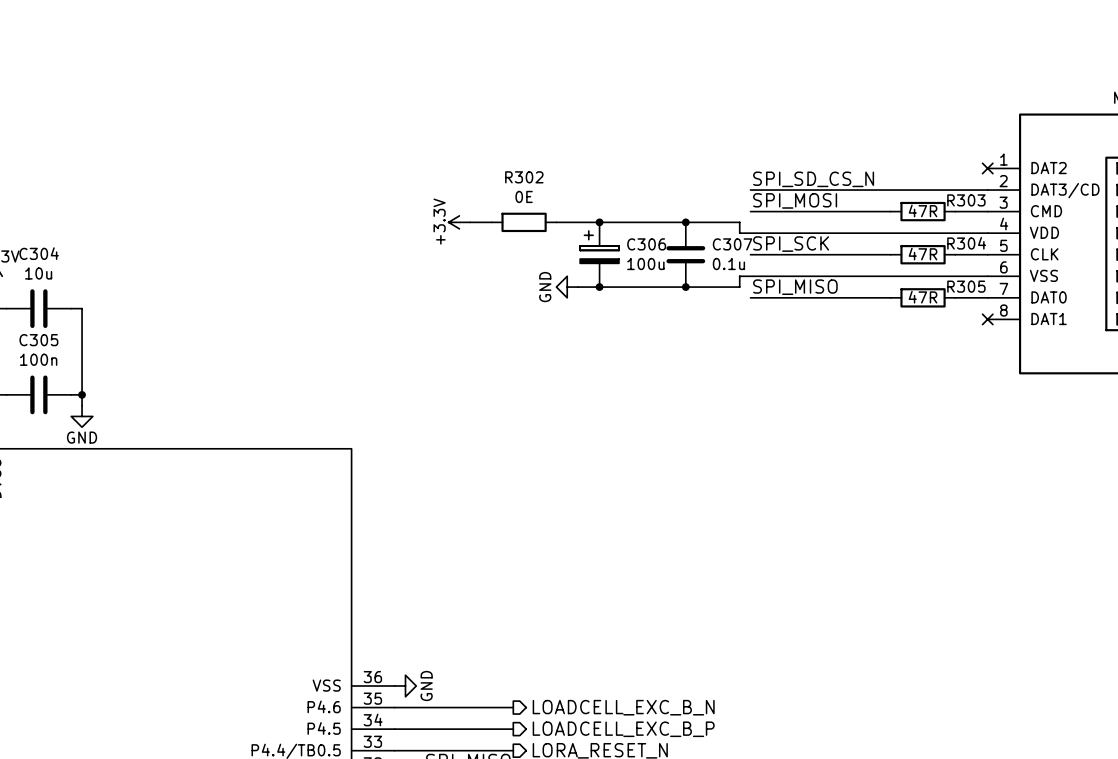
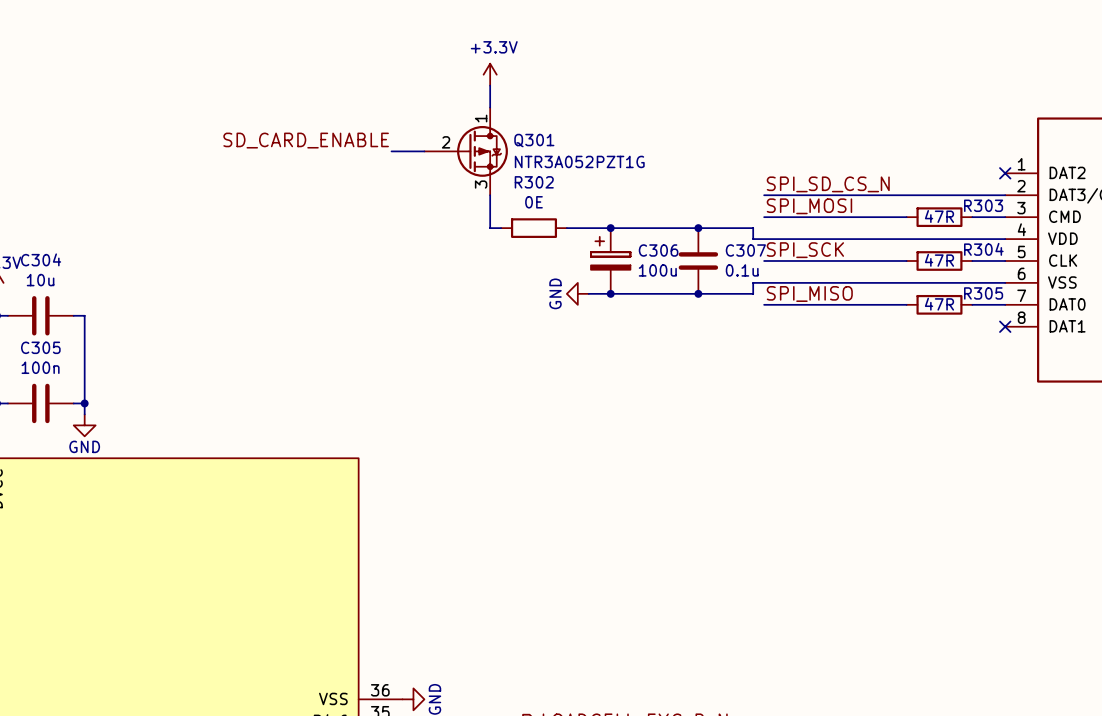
wire: none -> (490, 85) (490, 107)
label: none -> SD_CARD_ENABLE (306, 140)
wire: none -> (391, 151) (424, 151)
Q301: none -> NTR3A052PZT1G (466, 151)
power symbol rotation: 0° (459, 222) -> 90° clockwise (490, 74)
power symbol position: +3.3V (459, 222) -> +3.3V (490, 74)
wire: (470, 222) (480, 222) -> (490, 195) (490, 228)

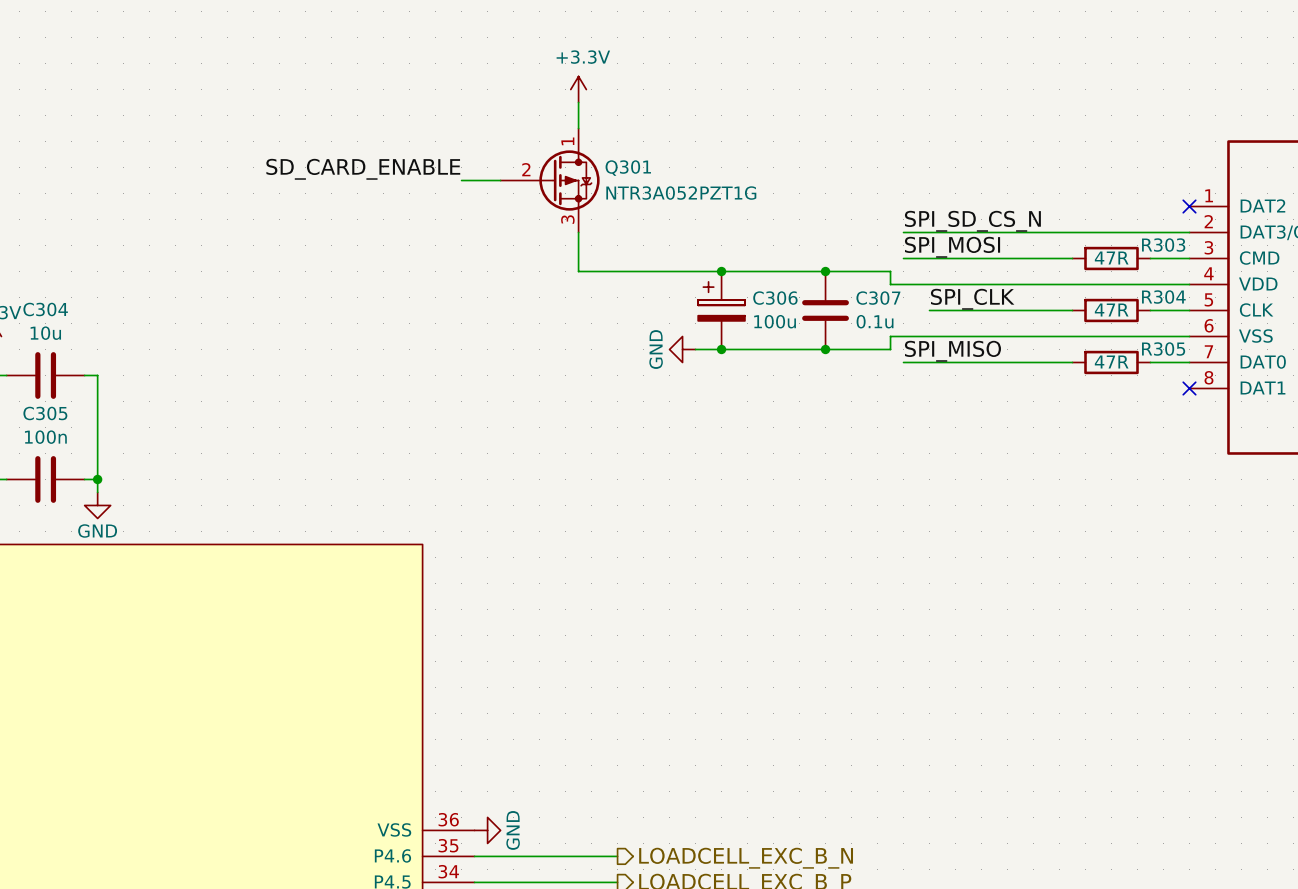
wire: none -> (591, 271) (669, 271)
R302: 0E (534, 228) -> none
label: SPI_SCK (805, 250) -> SPI_CLK (972, 299)
wire: (764, 260) (786, 260) -> none

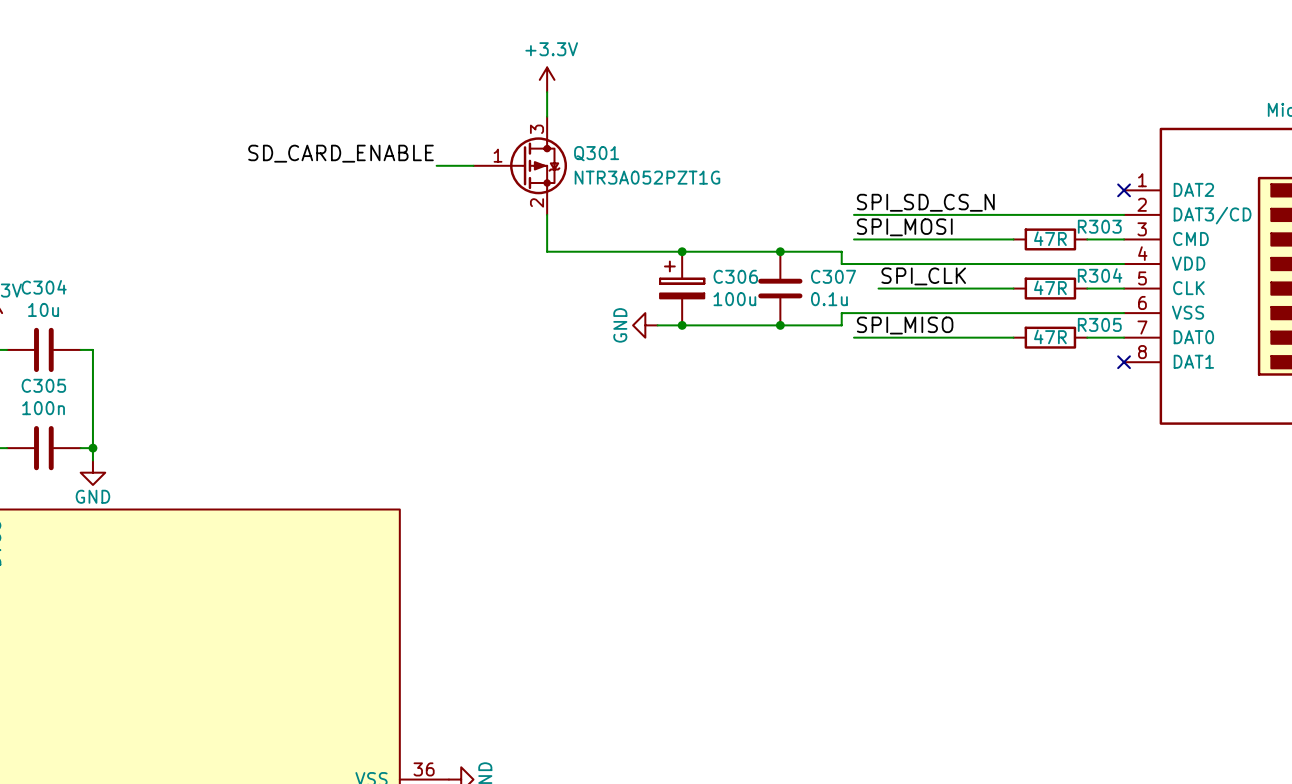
Q301 pin number: 1 (567, 141) -> 3 (537, 129)
Q301 pin number: 2 (526, 169) -> 1 (498, 155)
Q301 pin number: 3 (567, 219) -> 2 (537, 202)

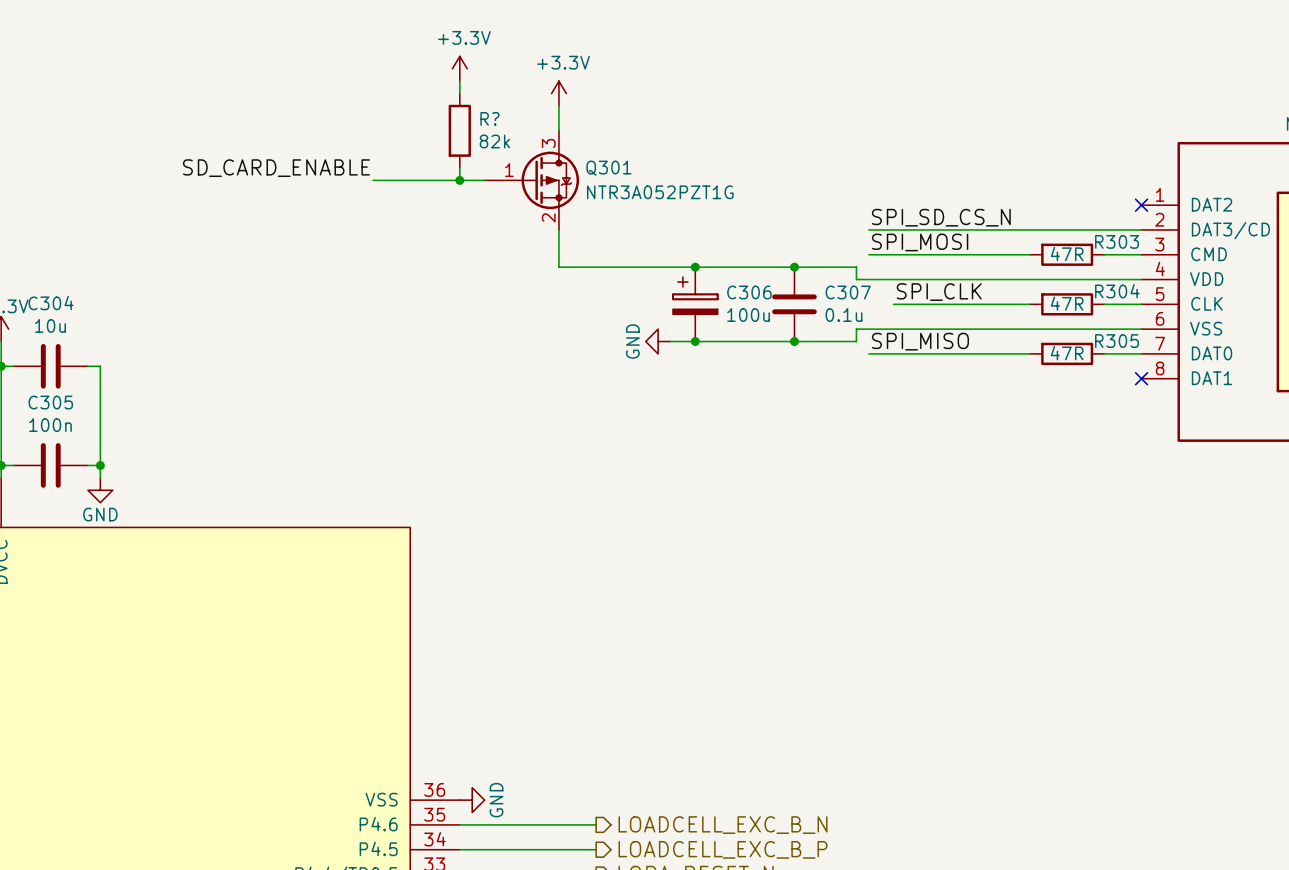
power symbol: none -> +3.3V (459, 68)
wire: none -> (459, 81) (459, 93)
R?: none -> 82k (459, 130)
label position: SD_CARD_ENABLE (340, 153) -> SD_CARD_ENABLE (276, 168)
wire: none -> (459, 167) (459, 180)
wire: none -> (373, 180) (447, 180)
junction: none -> (459, 180)

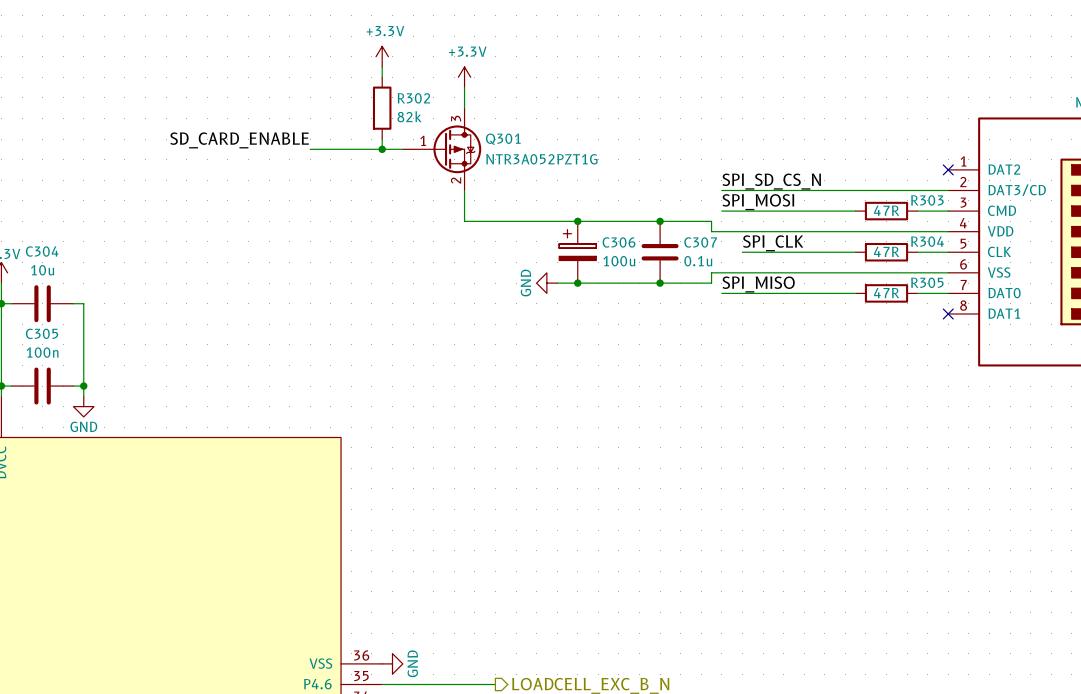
R? name: R? (489, 118) -> R302 (413, 98)

